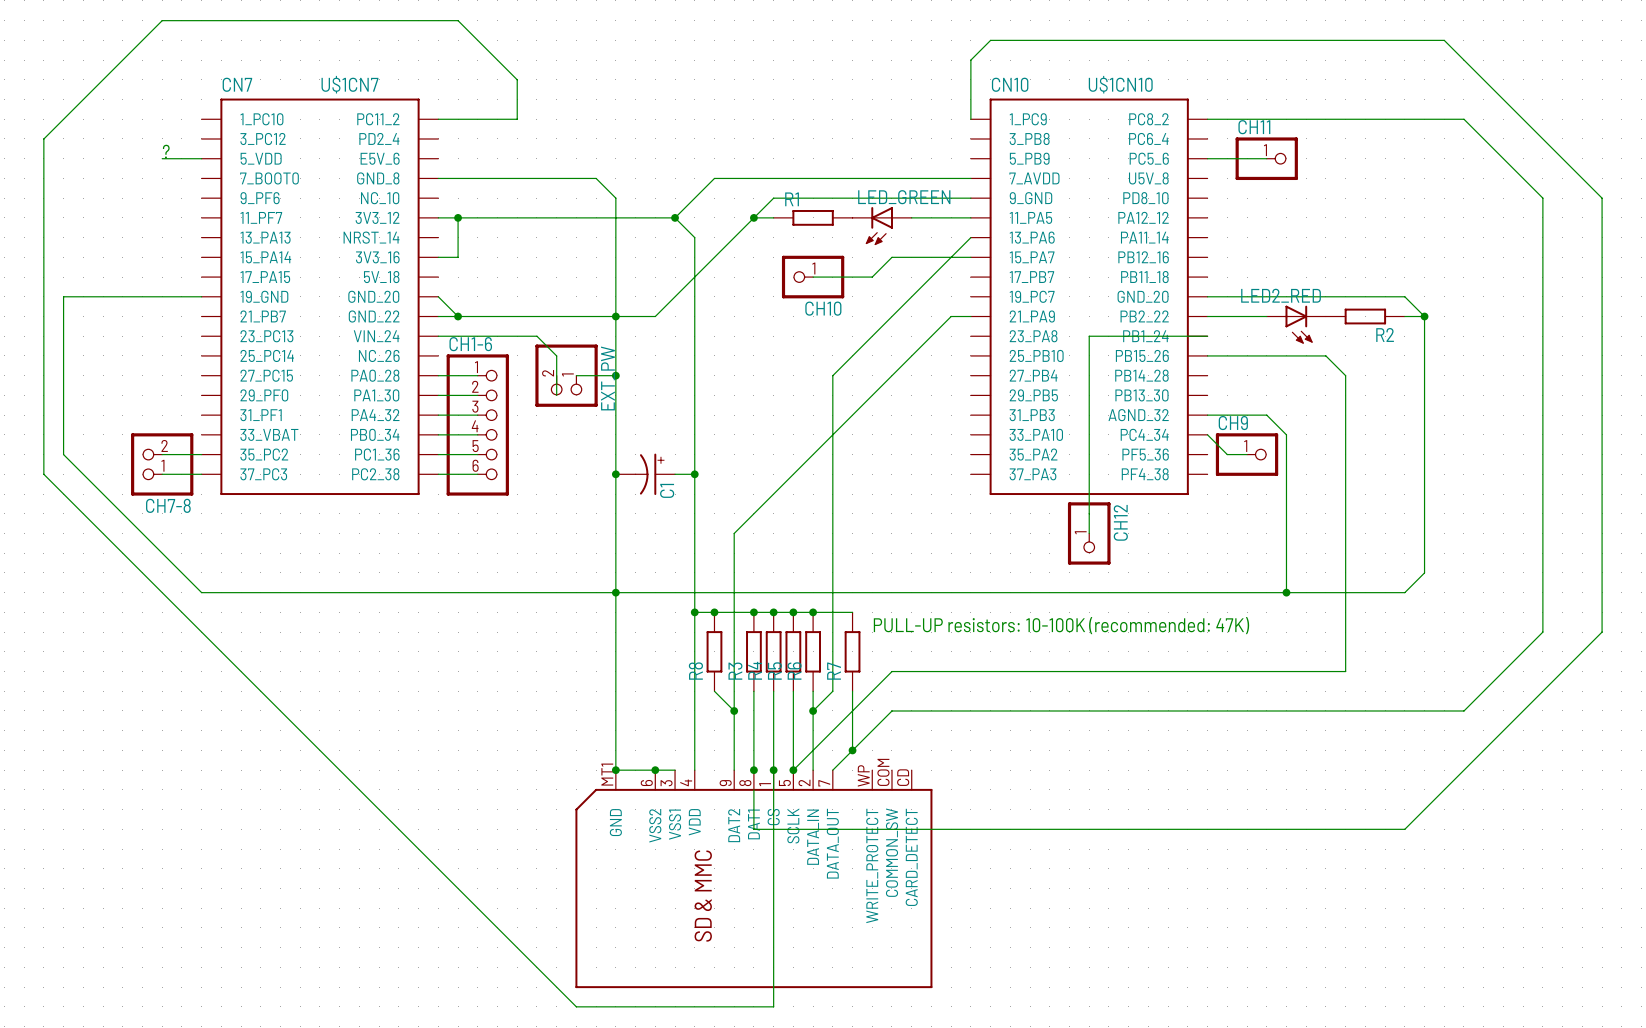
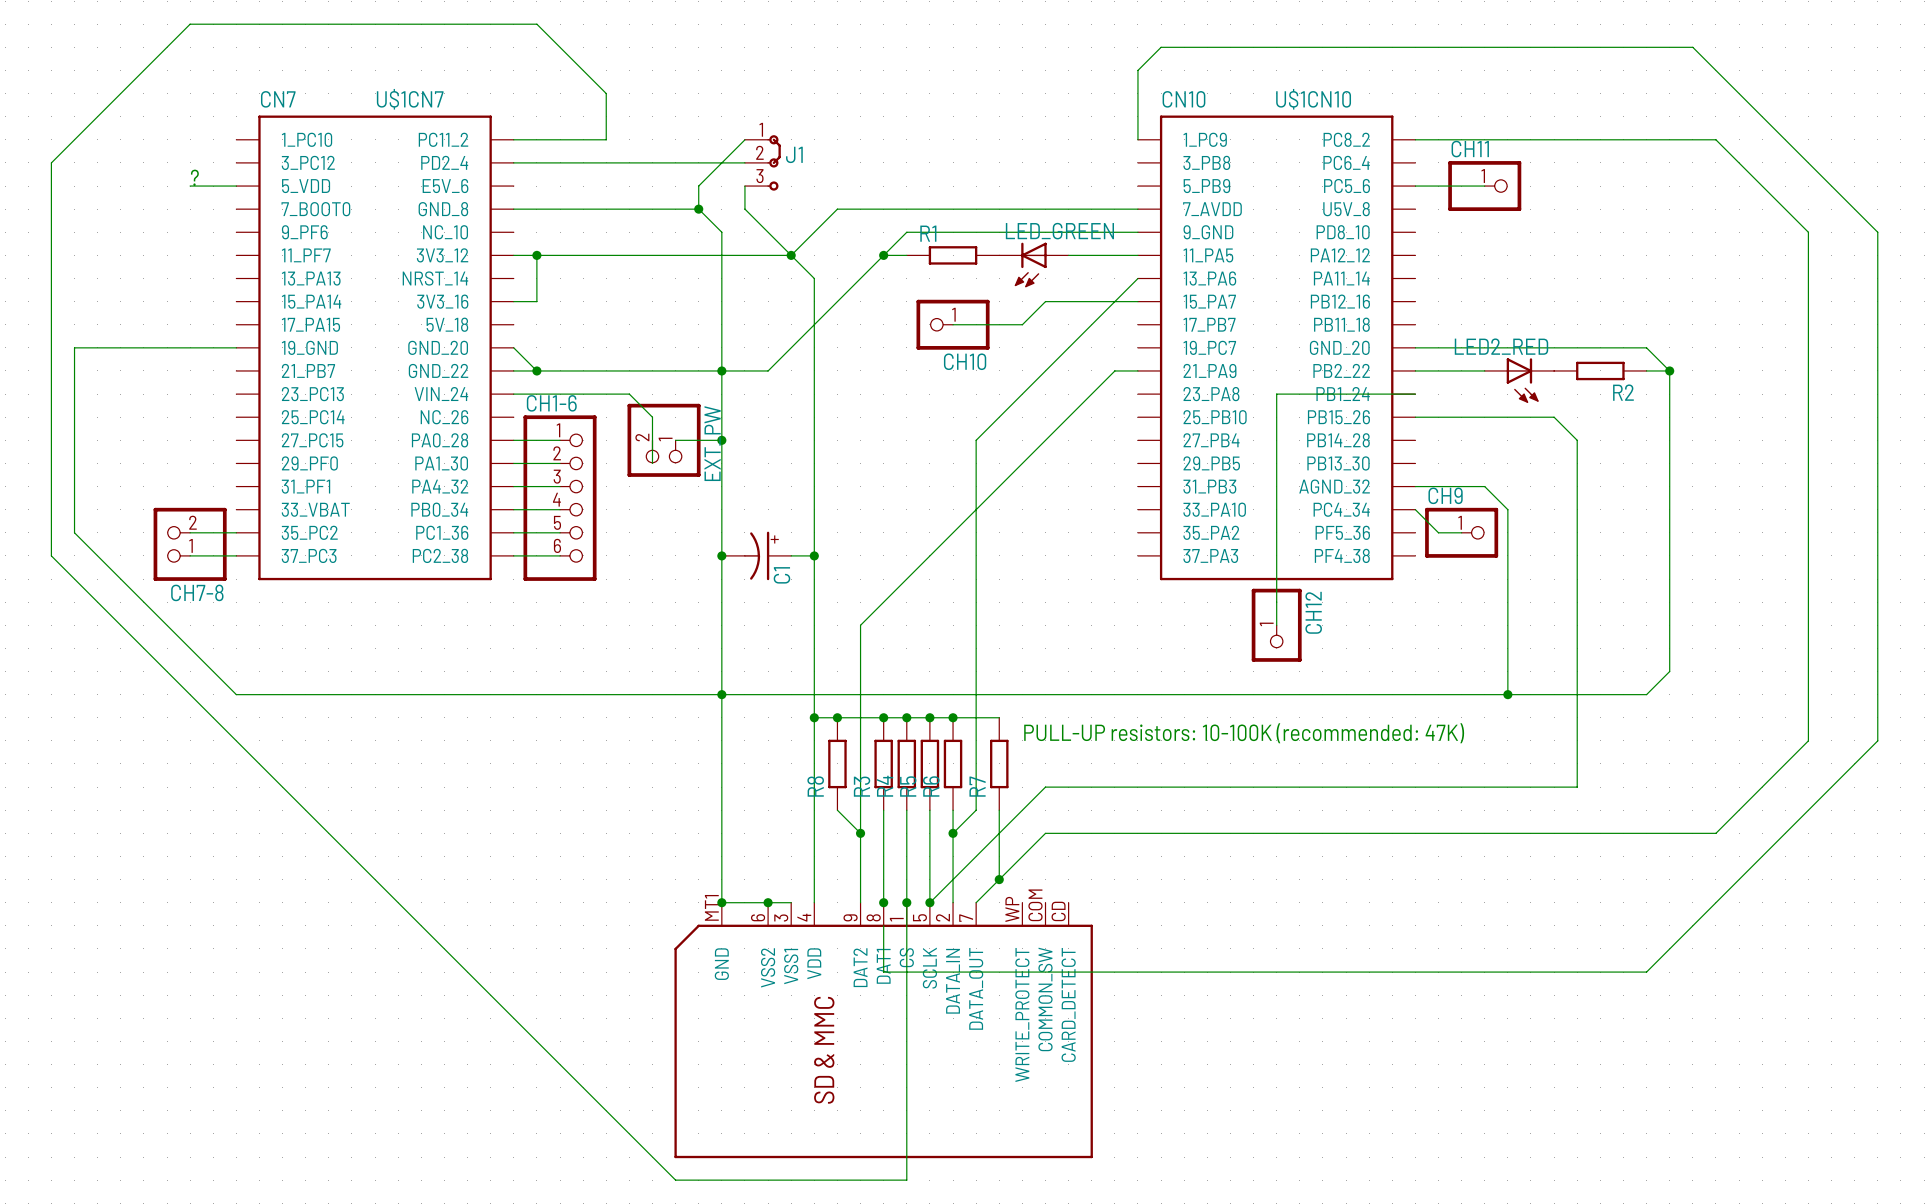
wire: none -> (744, 139) (698, 186) (698, 209)
wire: none -> (513, 162) (744, 162)
J1: none -> (762, 162)
wire: none -> (744, 186) (744, 209) (791, 255)
junction: none -> (698, 209)

